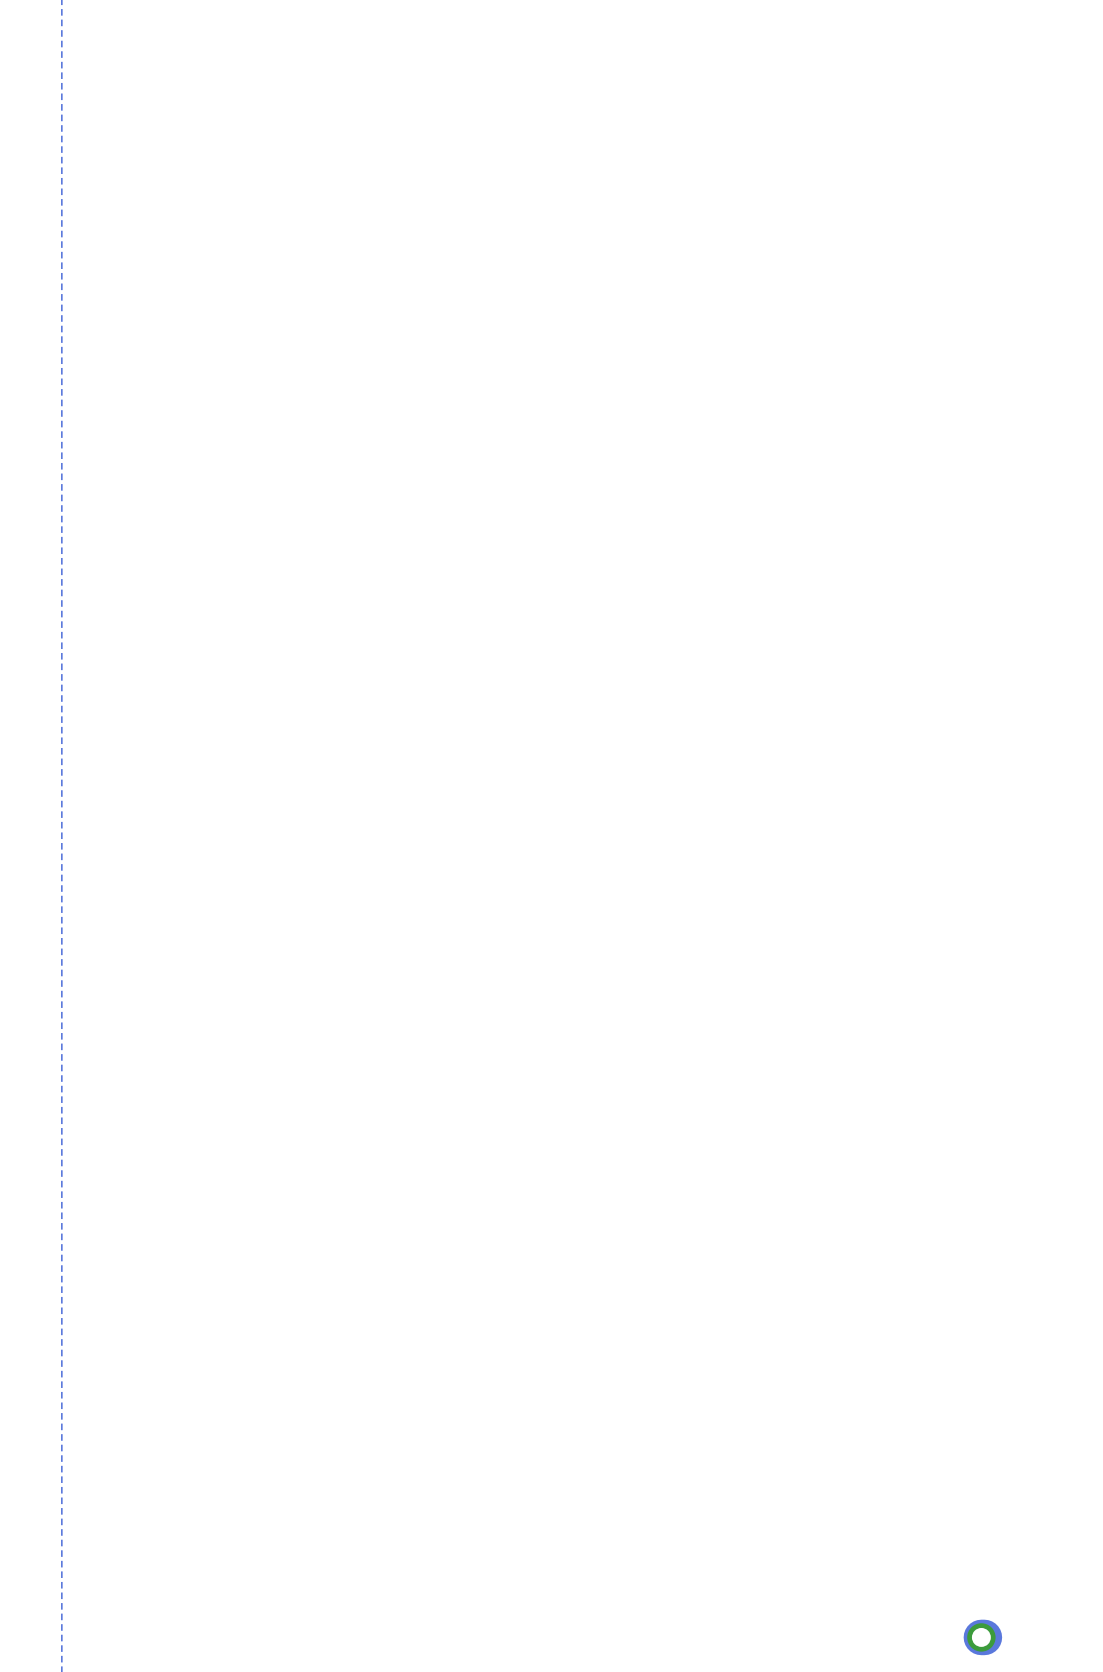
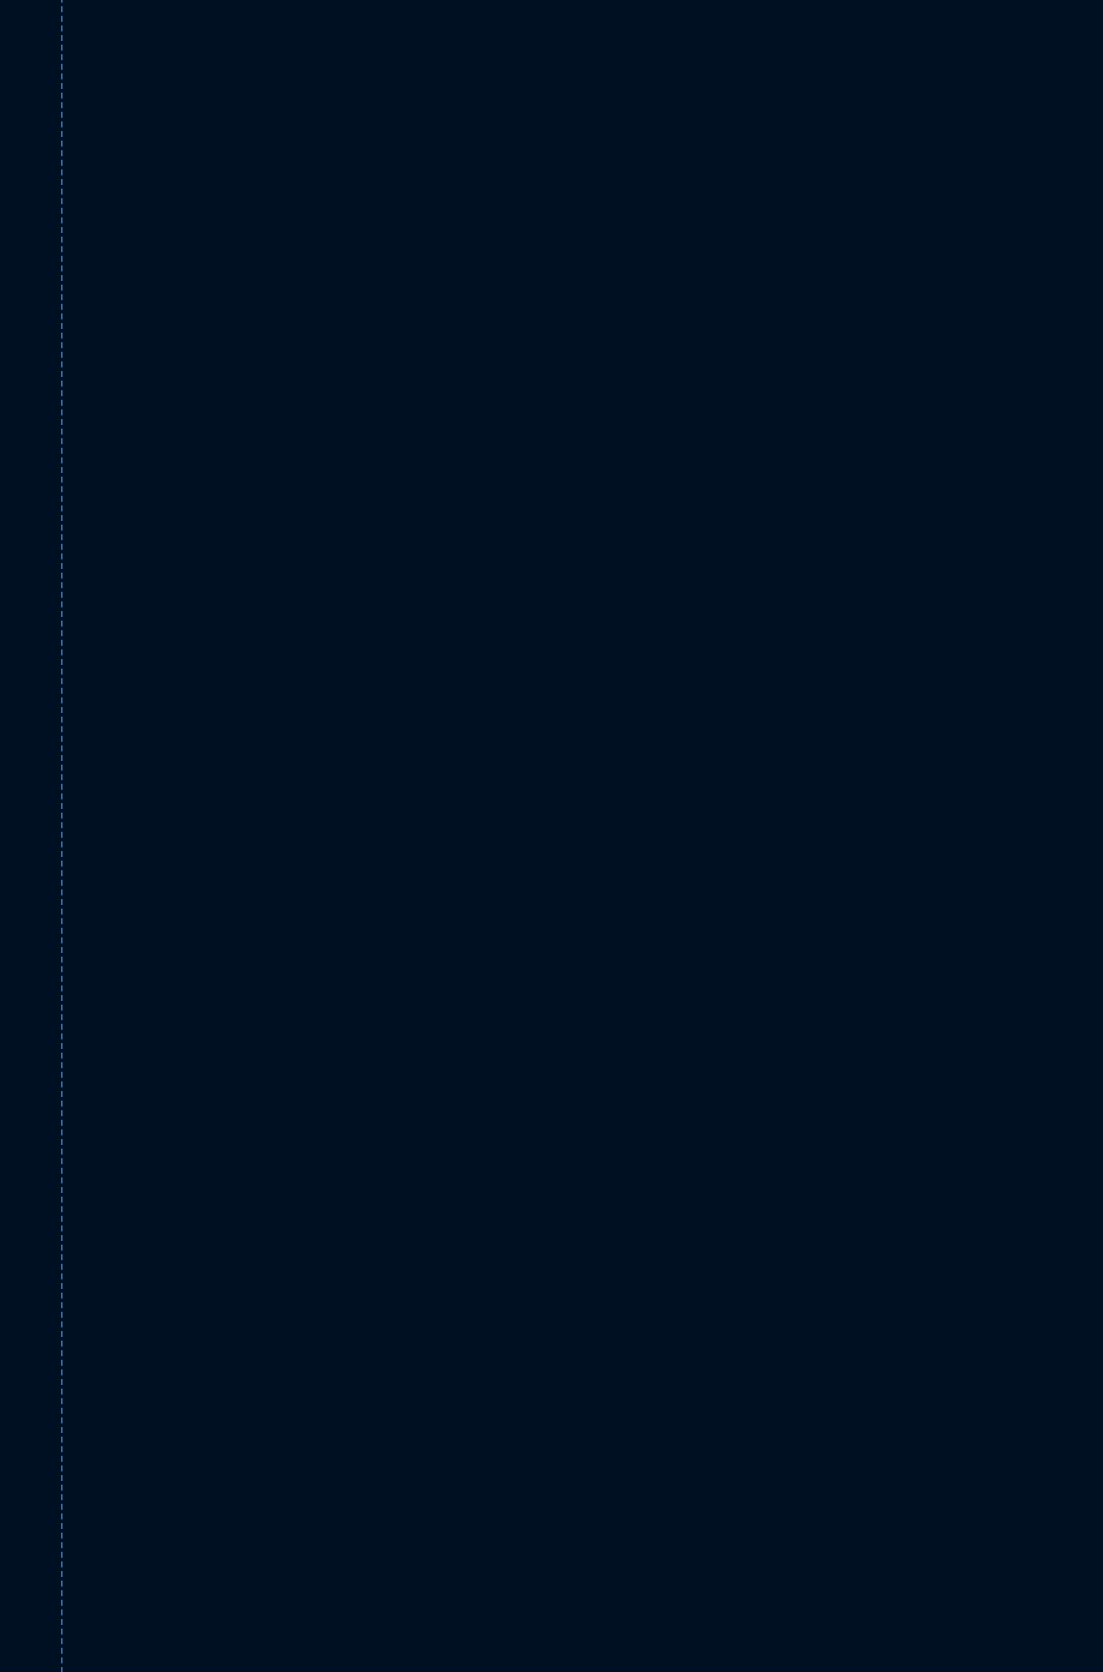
via: (981, 1637) -> none
track: (984, 1637) (981, 1637) -> none

